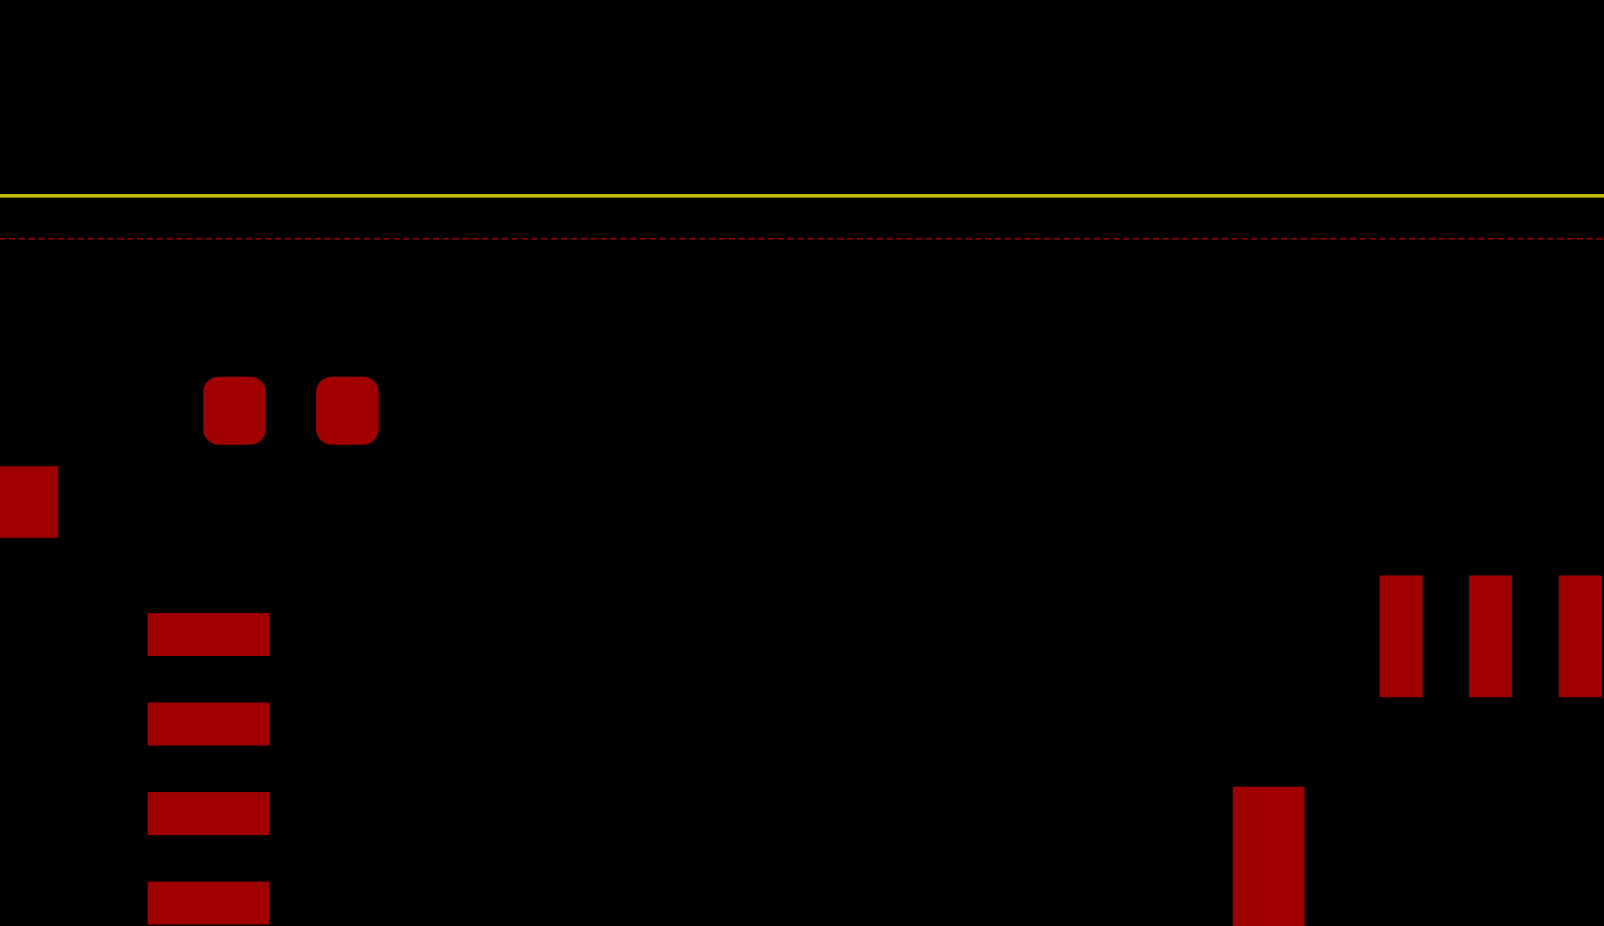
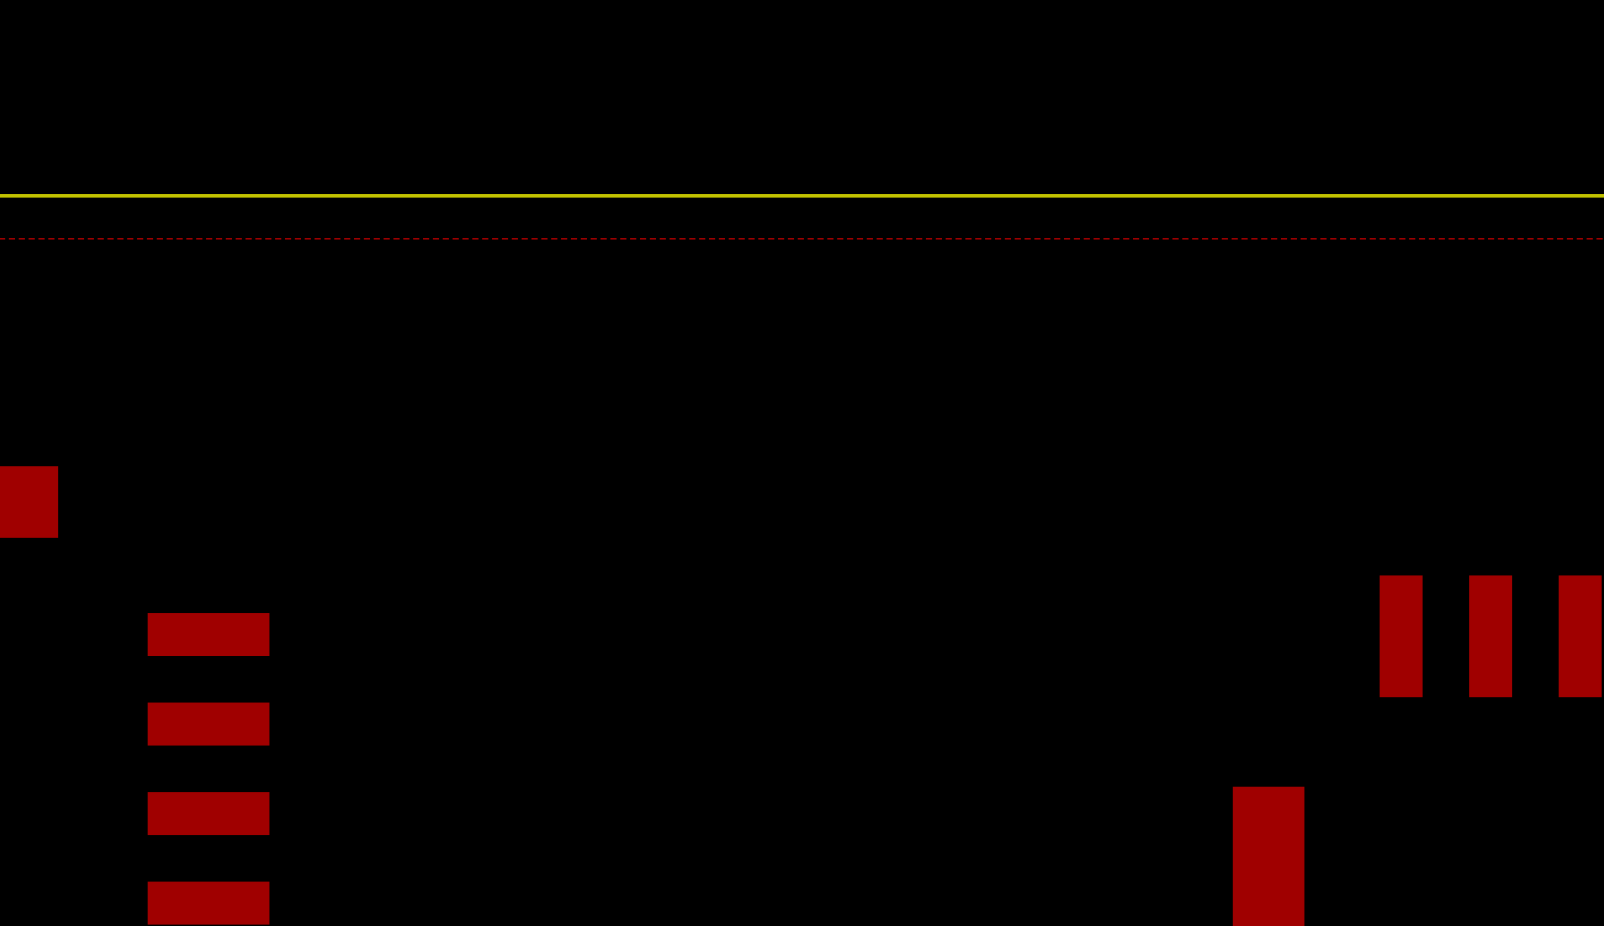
part: (290, 410) -> none

